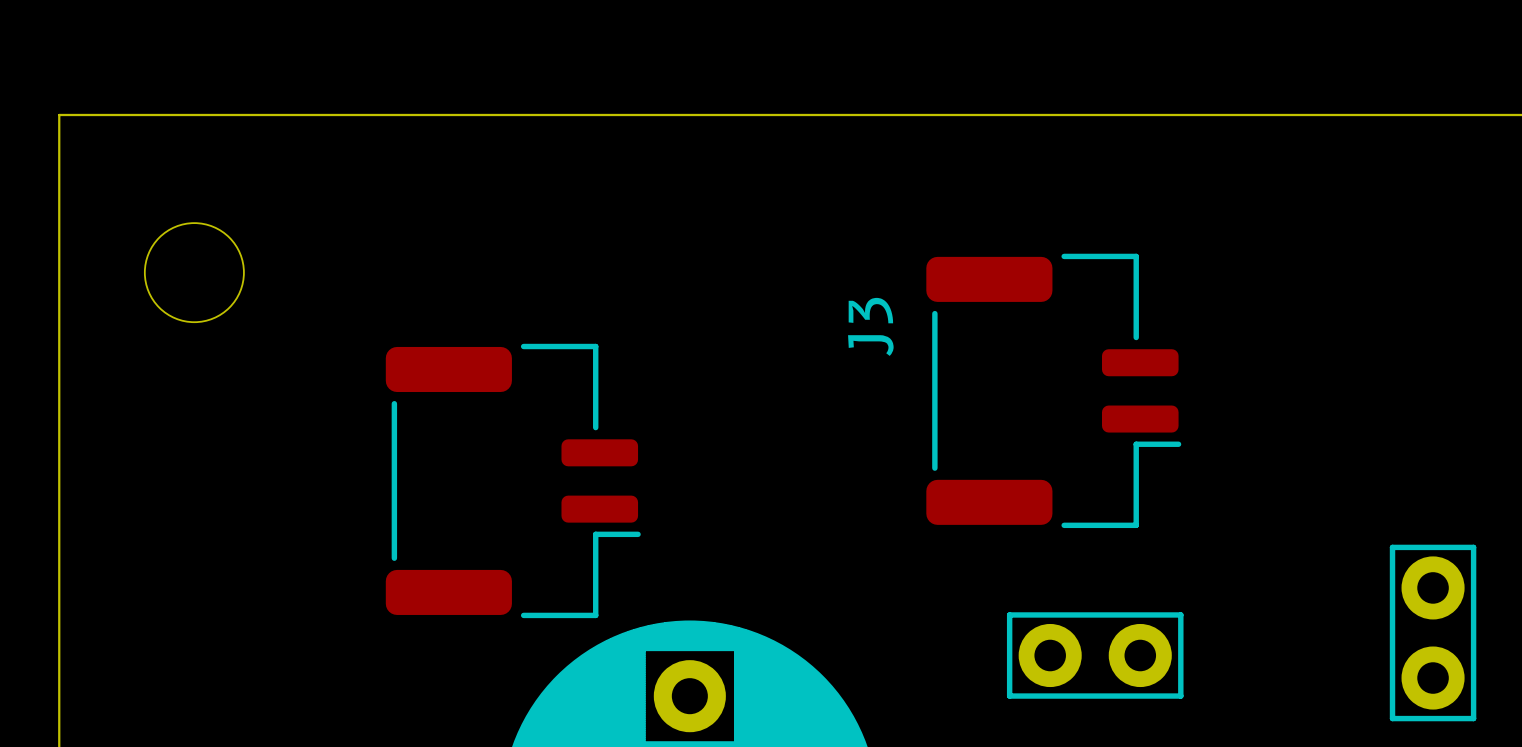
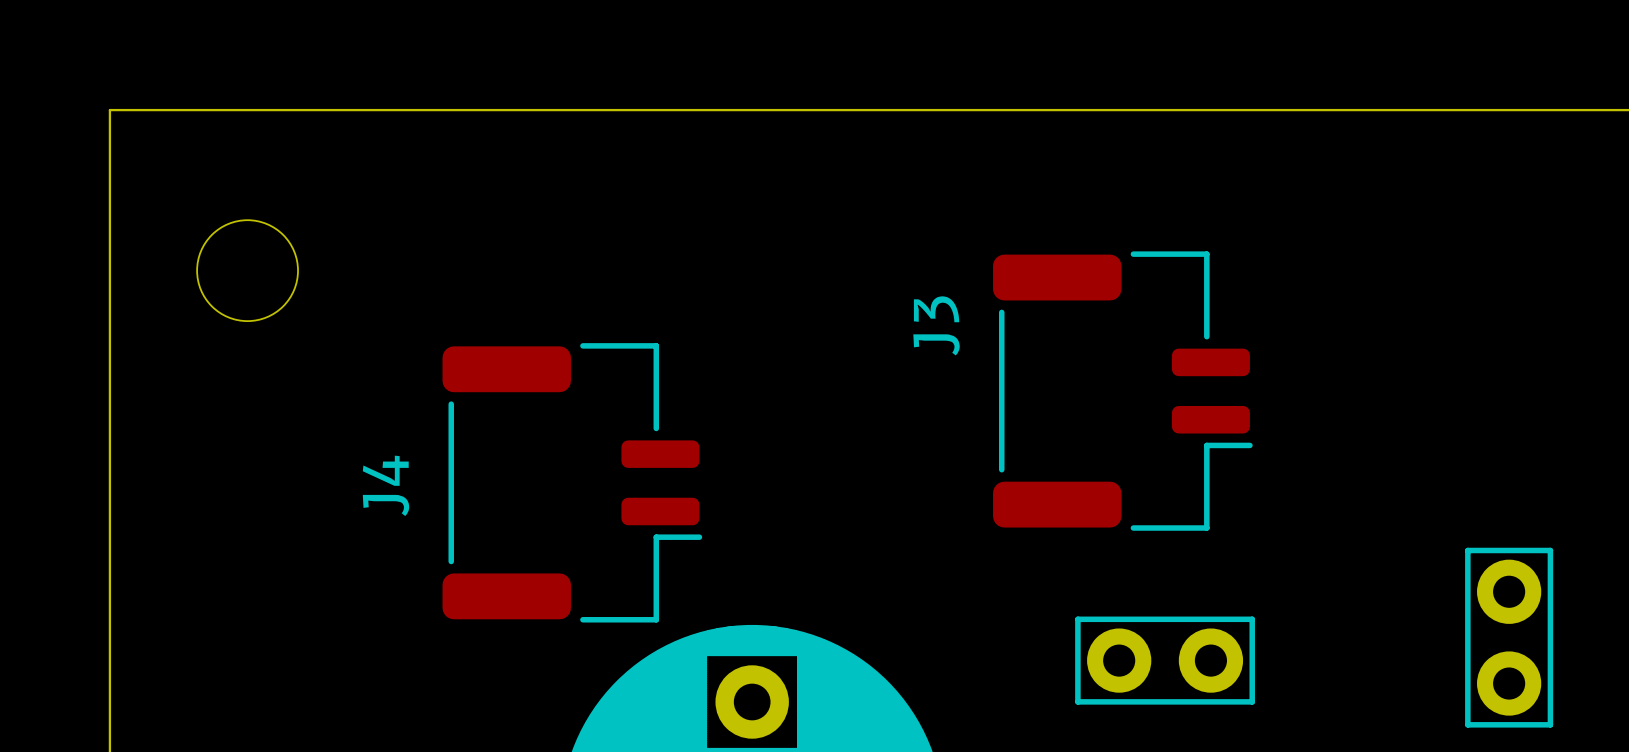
J4 name: none -> J4 (386, 485)

